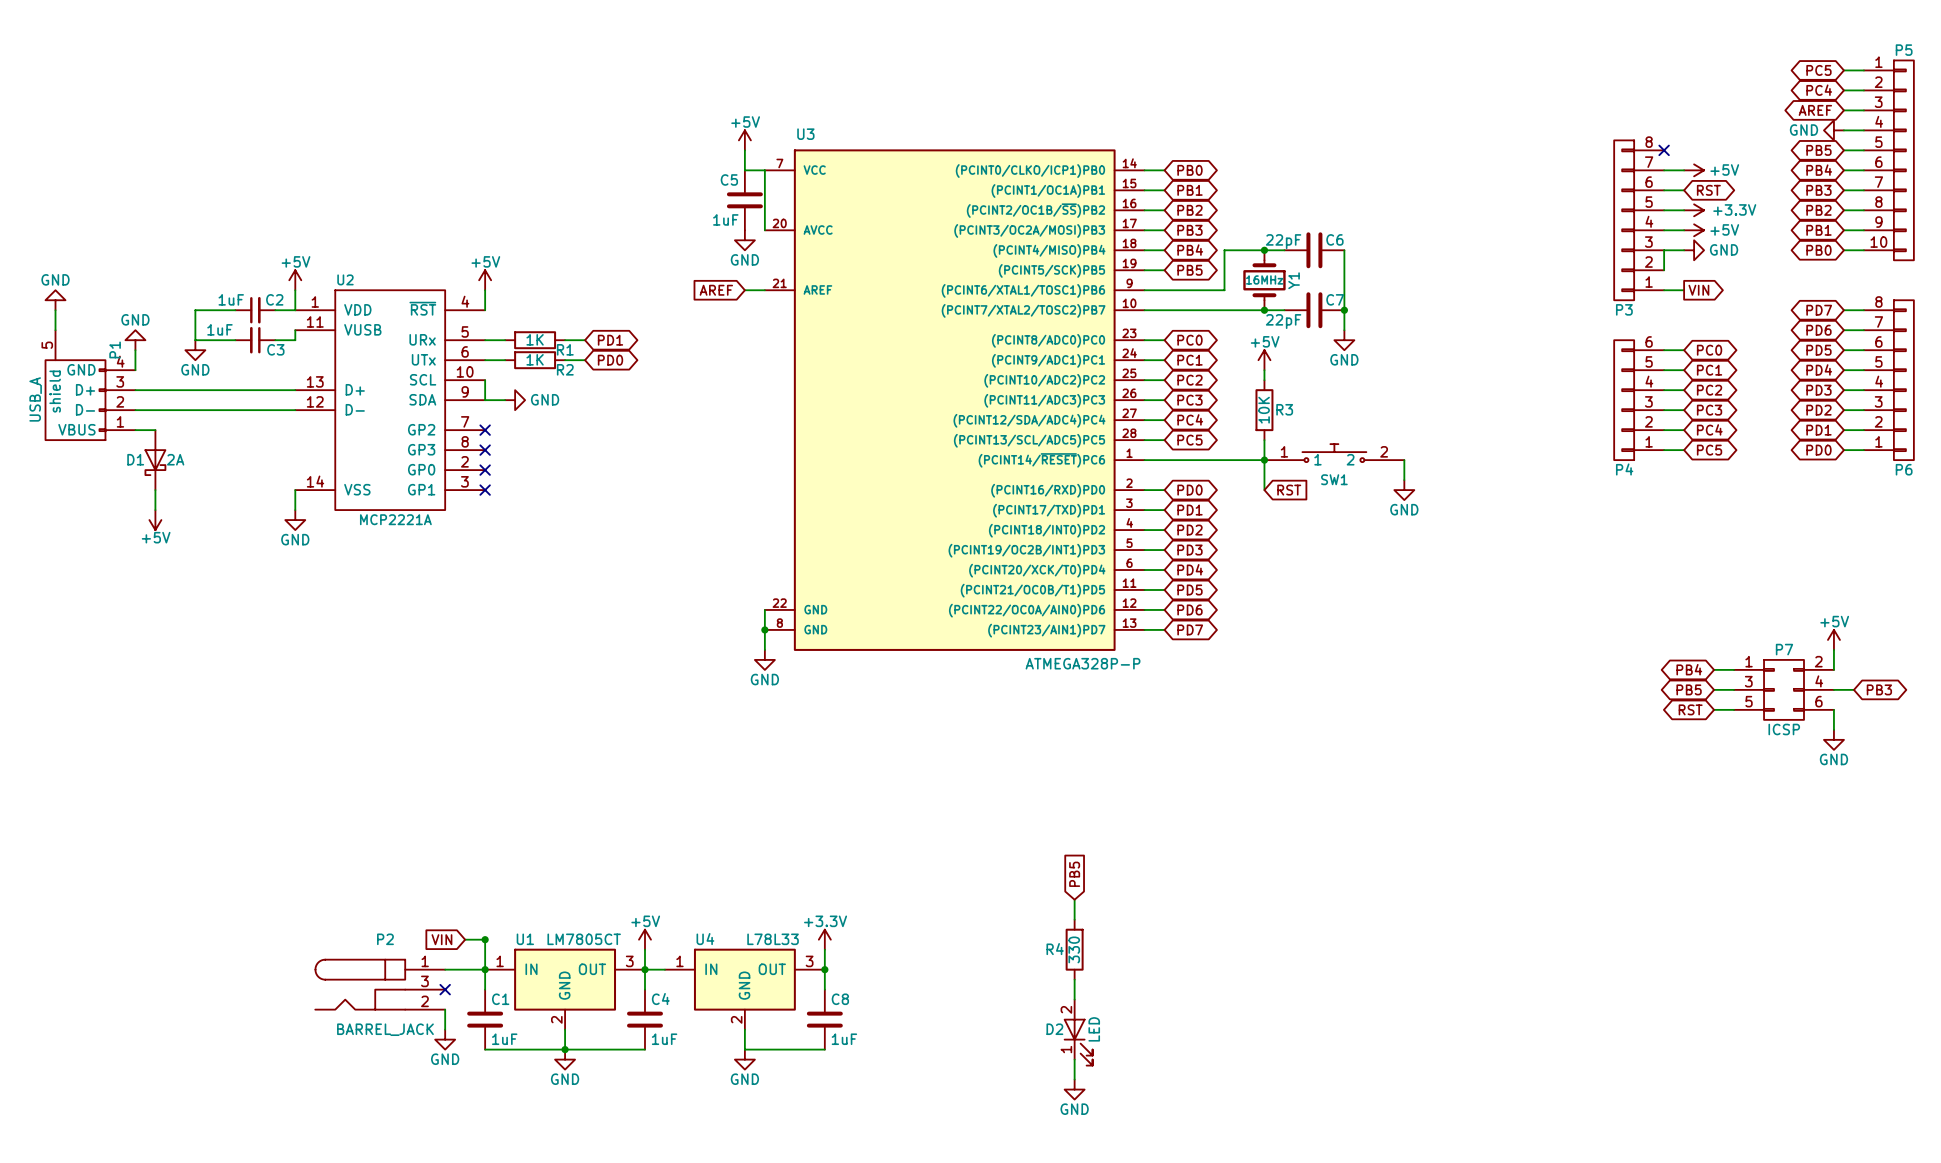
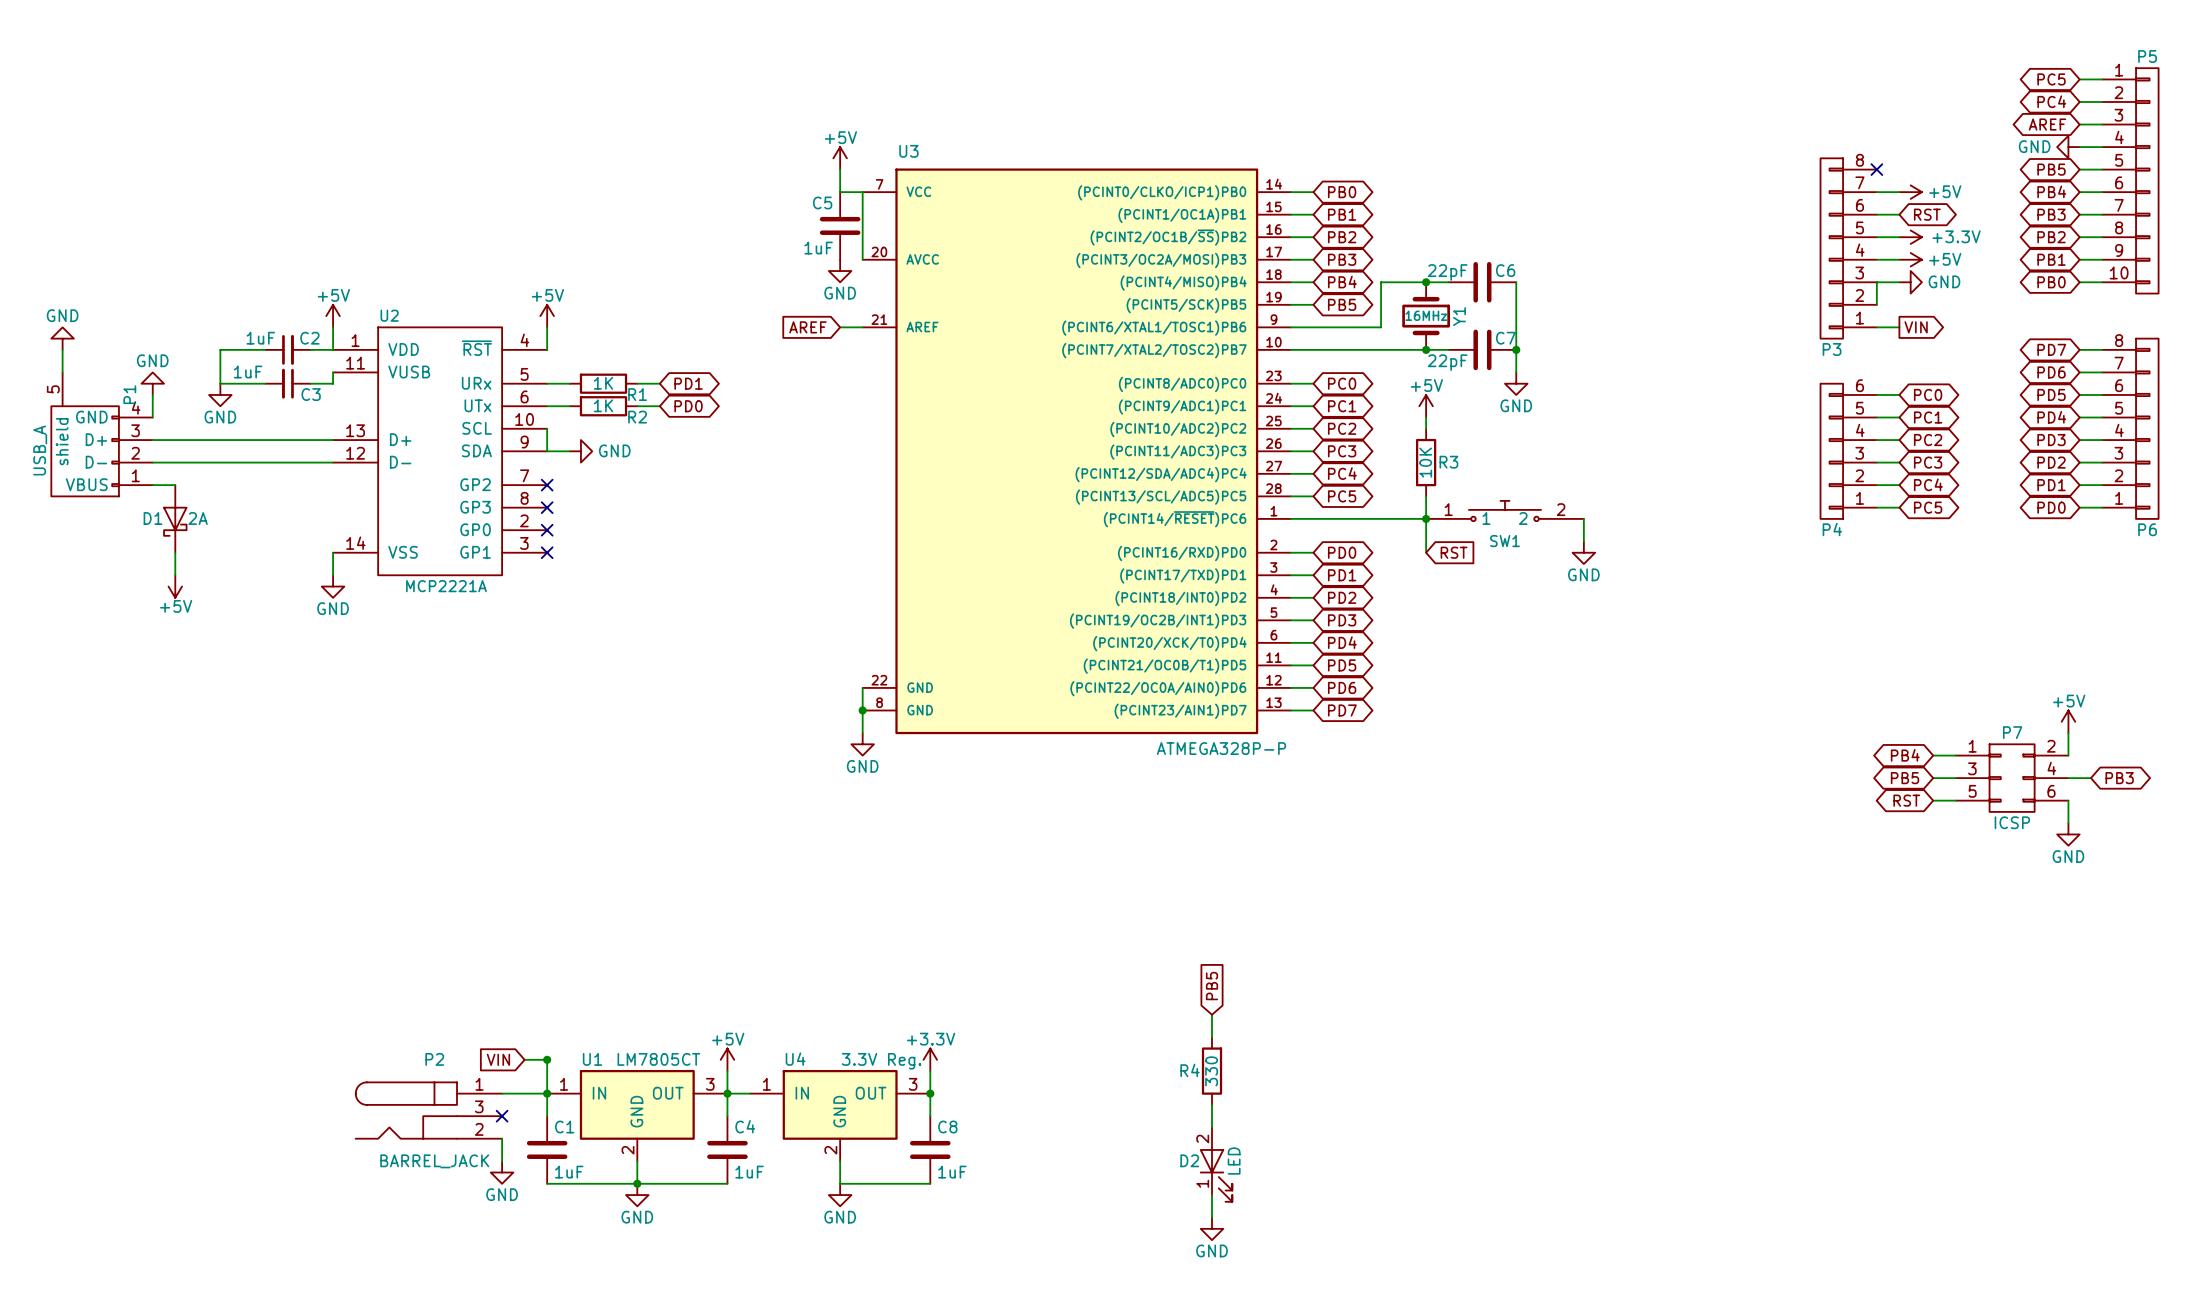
U4 value: L78L33 (773, 939) -> 3.3V Reg. (881, 1061)

